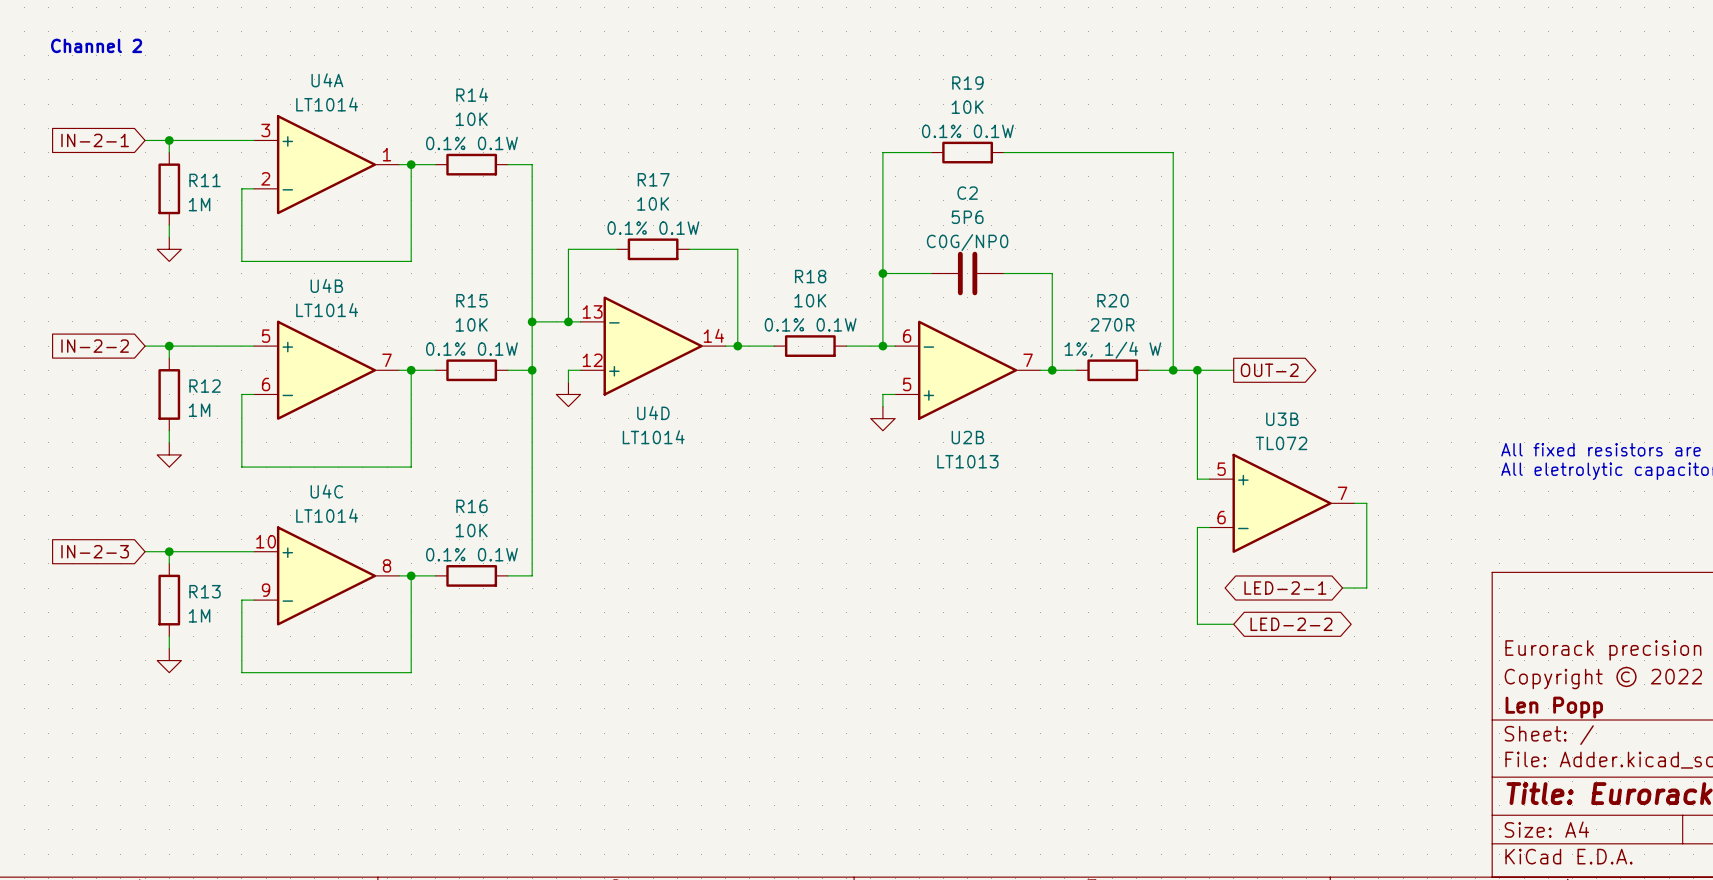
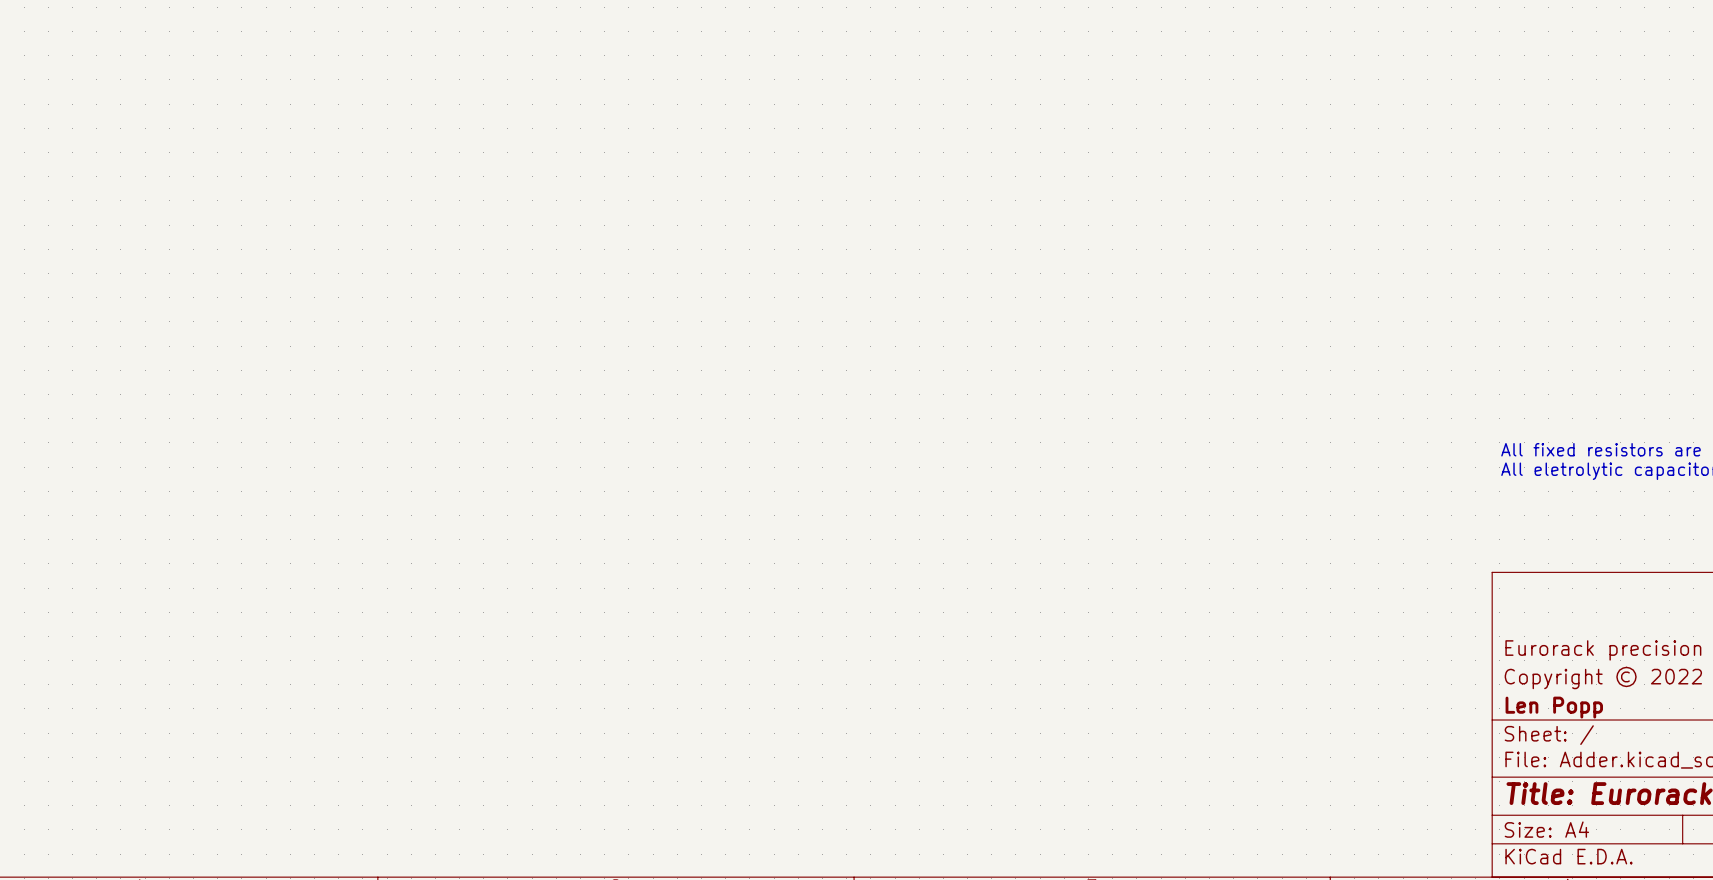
text: Channel 2 (96, 45) -> none
global label: IN-2-1 (95, 140) -> none
wire: (145, 140) (253, 140) -> none
wire: (169, 140) (169, 152) -> none
junction: (169, 140) -> none
wire: (931, 152) (882, 152) (882, 346) -> none
R19: 10K (967, 152) -> none
wire: (1003, 152) (1173, 152) (1173, 370) -> none
U4A: LT1014 (326, 164) -> none
wire: (399, 164) (435, 164) -> none
wire: (411, 164) (411, 261) (241, 261) (241, 188) (253, 188) -> none
junction: (411, 164) -> none
R14: 10K (471, 164) -> none
wire: (507, 164) (532, 164) (532, 575) (507, 575) -> none
R11: 1M (169, 188) -> none
wire: (169, 225) (169, 237) -> none
power symbol: (169, 249) -> none
wire: (616, 249) (568, 249) (568, 321) -> none
R17: 10K (653, 249) -> none
wire: (689, 249) (737, 249) (737, 346) -> none
wire: (882, 273) (931, 273) -> none
junction: (882, 273) -> none
C2: 5P6 (967, 273) -> none
wire: (1003, 273) (1052, 273) (1052, 370) -> none
wire: (532, 321) (580, 321) -> none
junction: (532, 321) -> none
junction: (568, 321) -> none
global label: IN-2-2 (95, 346) -> none
wire: (145, 346) (253, 346) -> none
wire: (169, 346) (169, 358) -> none
junction: (169, 346) -> none
U4D: LT1014 (653, 346) -> none
wire: (725, 346) (774, 346) -> none
junction: (737, 346) -> none
R18: 10K (810, 346) -> none
wire: (846, 346) (895, 346) -> none
junction: (882, 346) -> none
U4B: LT1014 (326, 370) -> none
wire: (399, 370) (435, 370) -> none
wire: (411, 370) (411, 467) (241, 467) (241, 394) (253, 394) -> none
junction: (411, 370) -> none
R15: 10K (471, 370) -> none
wire: (507, 370) (532, 370) -> none
junction: (532, 370) -> none
wire: (580, 370) (568, 370) (568, 382) -> none
U2B: LT1013 (967, 370) -> none
wire: (1040, 370) (1076, 370) -> none
junction: (1052, 370) -> none
R20: 270R (1112, 370) -> none
wire: (1149, 370) (1233, 370) -> none
junction: (1173, 370) -> none
wire: (1197, 370) (1197, 479) (1209, 479) -> none
junction: (1197, 370) -> none
global label: OUT-2 (1269, 370) -> none
R12: 1M (169, 394) -> none
power symbol: (568, 394) -> none
wire: (895, 394) (882, 394) (882, 406) -> none
power symbol: (882, 418) -> none
wire: (169, 430) (169, 442) -> none
power symbol: (169, 454) -> none
U3B: TL072 (1282, 503) -> none
wire: (1354, 503) (1366, 503) (1366, 588) (1342, 588) -> none
wire: (1209, 527) (1197, 527) (1197, 624) (1233, 624) -> none
global label: IN-2-3 (95, 551) -> none
wire: (145, 551) (253, 551) -> none
wire: (169, 551) (169, 563) -> none
junction: (169, 551) -> none
U4C: LT1014 (326, 575) -> none
wire: (399, 575) (435, 575) -> none
wire: (411, 575) (411, 672) (241, 672) (241, 600) (253, 600) -> none
junction: (411, 575) -> none
R16: 10K (471, 575) -> none
global label: LED-2-1 (1285, 588) -> none
R13: 1M (169, 600) -> none
global label: LED-2-2 (1291, 624) -> none
wire: (169, 636) (169, 648) -> none
power symbol: (169, 660) -> none

